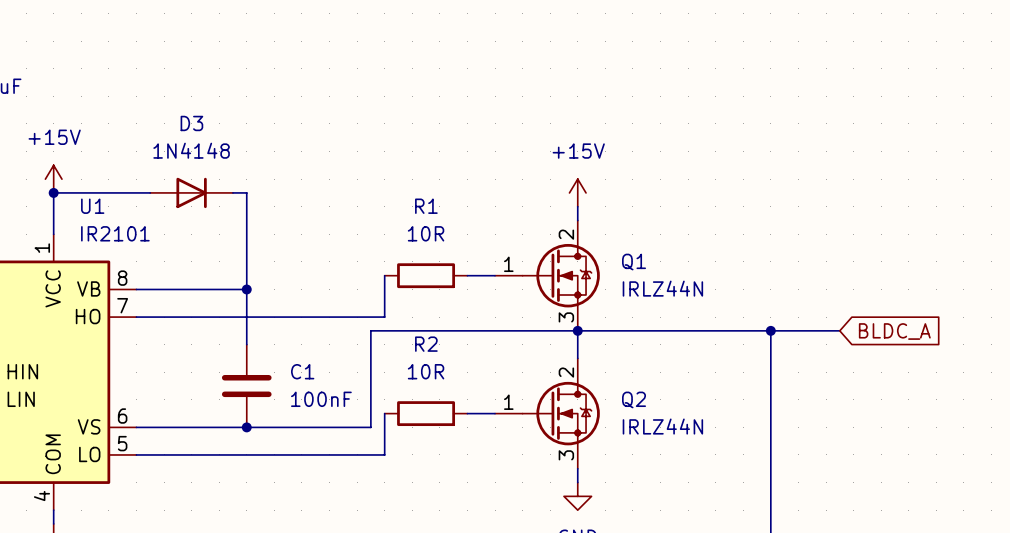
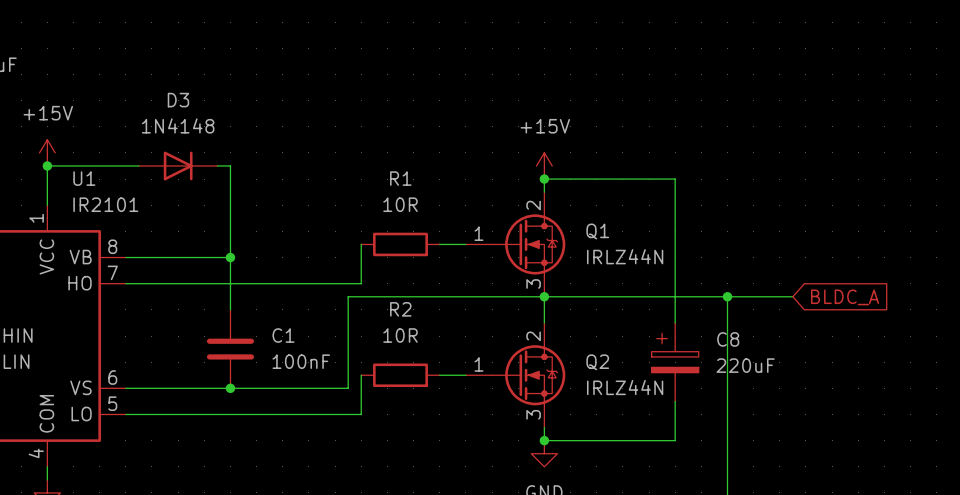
wire: none -> (544, 179) (675, 179) (675, 322)
junction: none -> (544, 179)
C8: none -> 220uF (675, 362)
wire: none -> (675, 401) (675, 440) (544, 440)
junction: none -> (544, 440)

